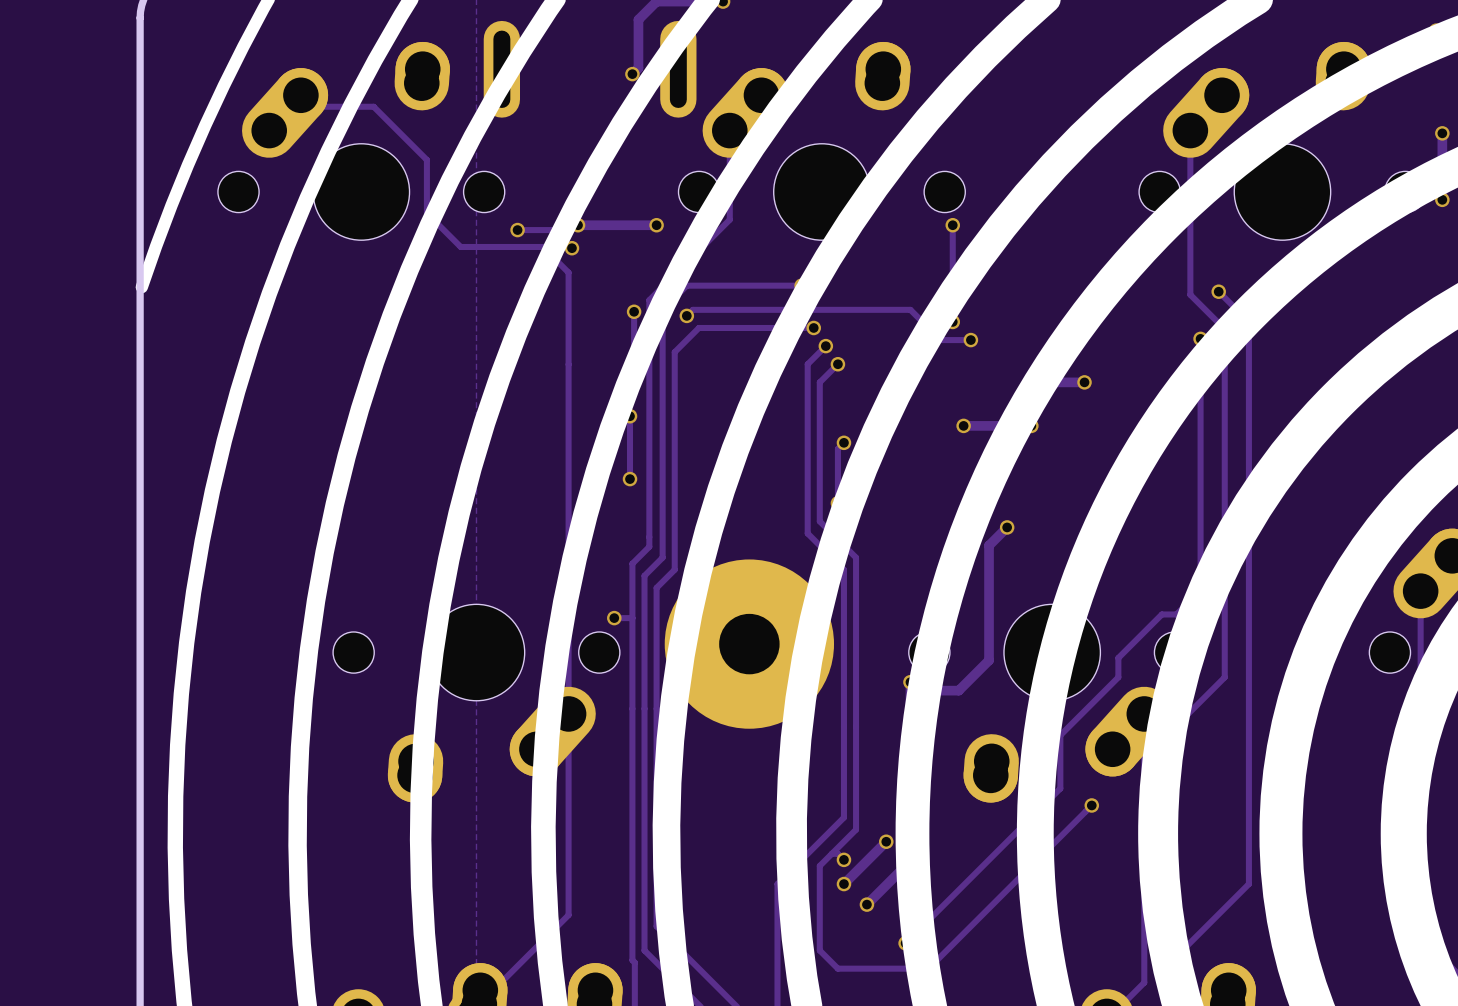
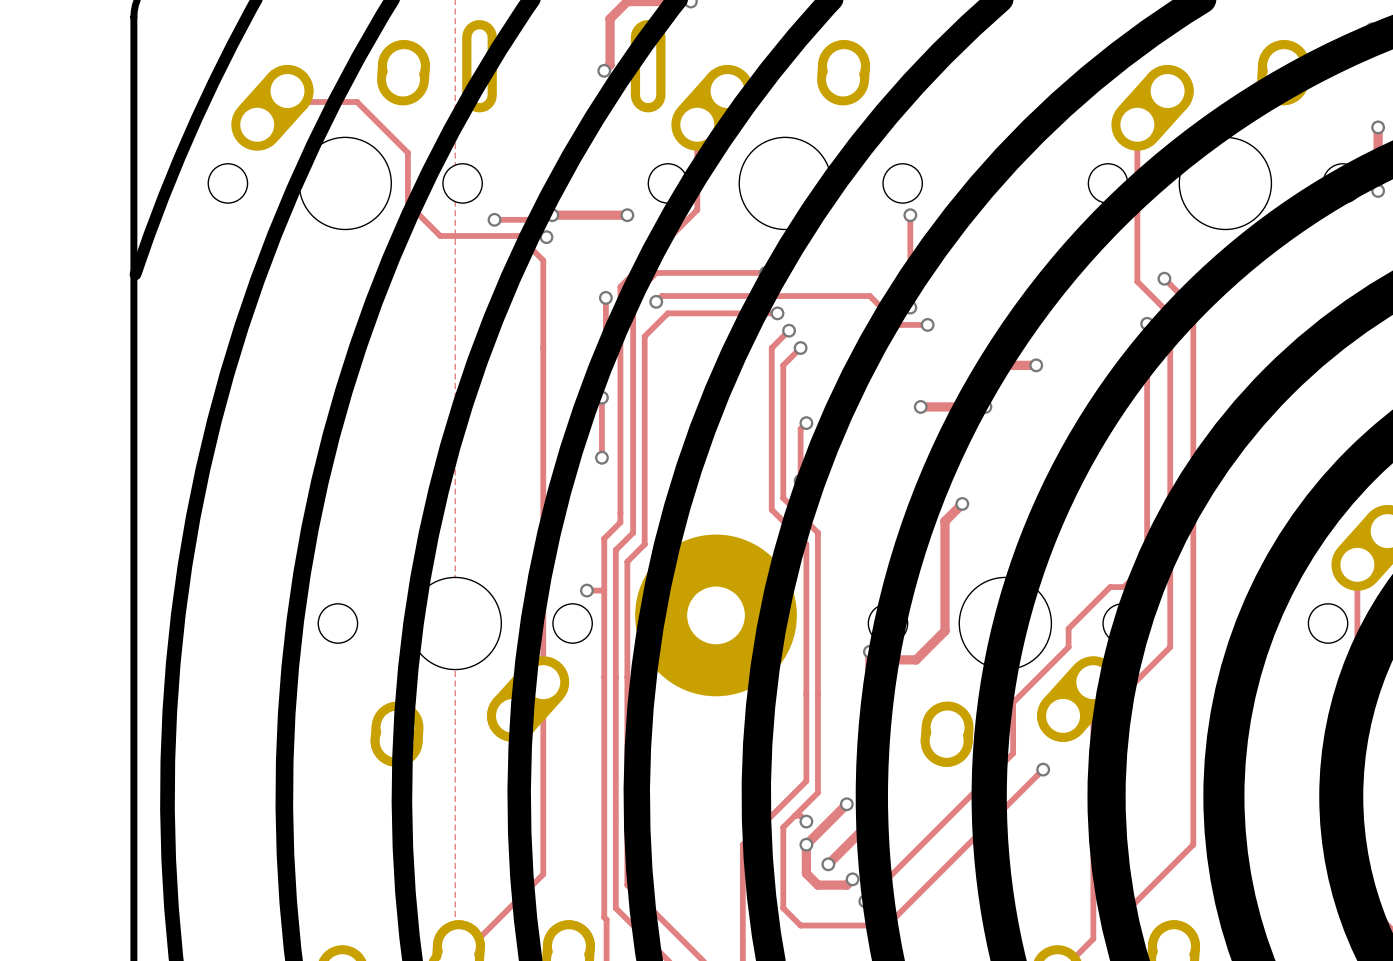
track: none -> (806, 844) (806, 873) (817, 885) (846, 885) (852, 879)
via: none -> (852, 879)

